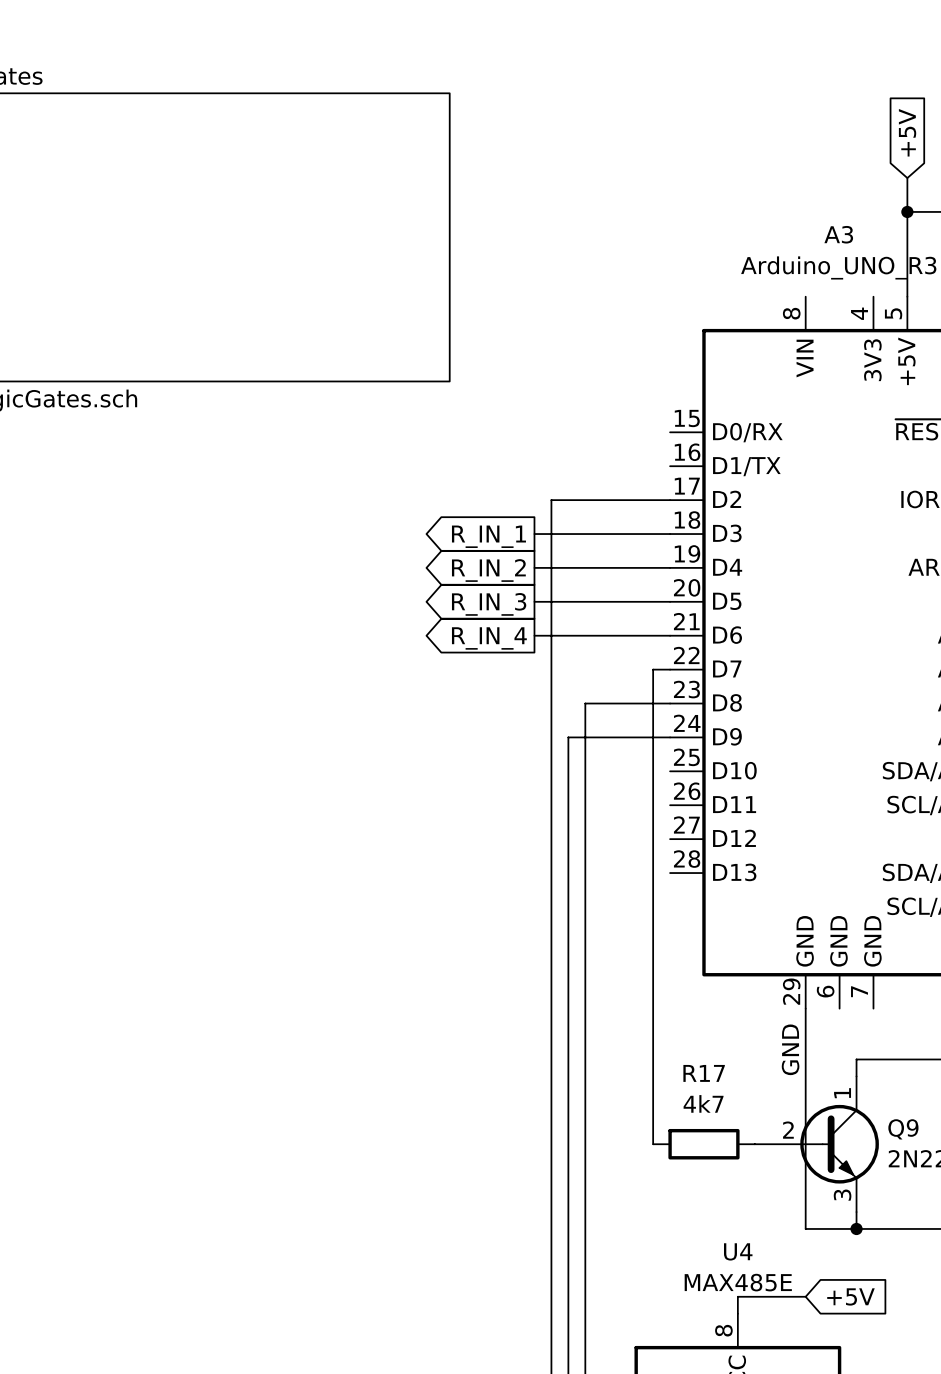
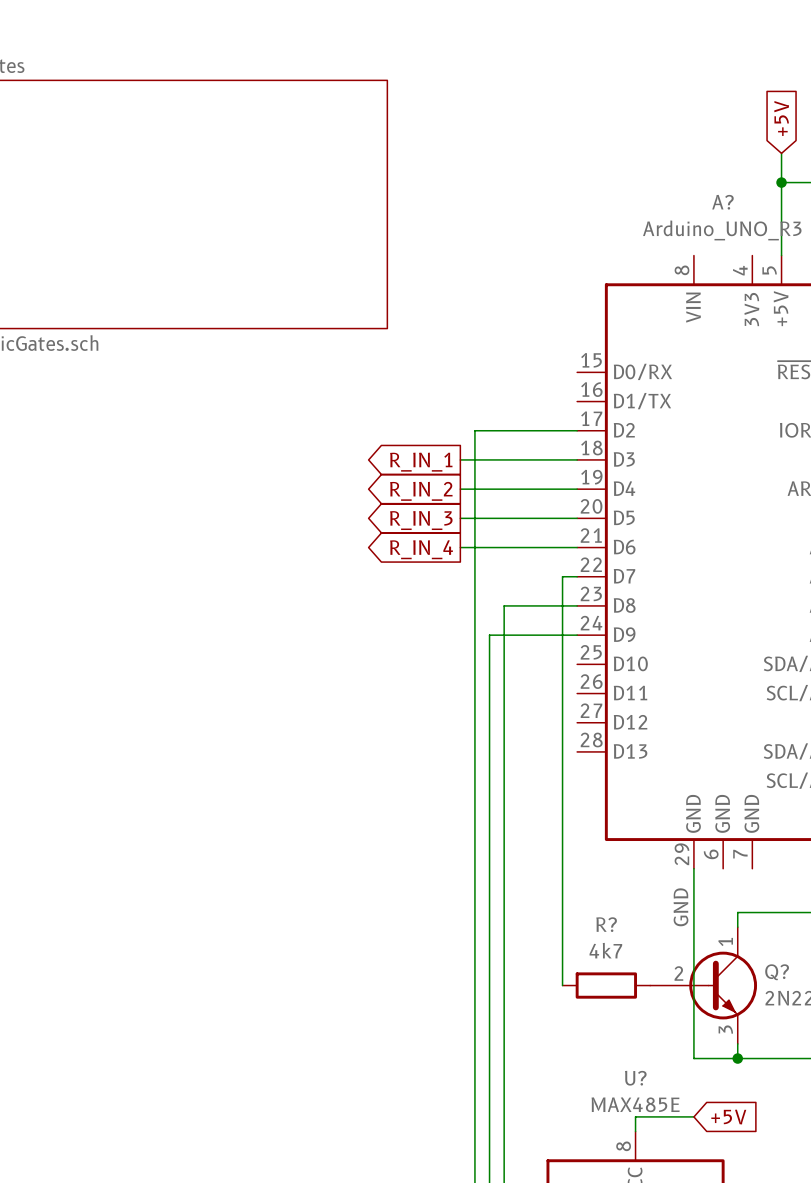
A3 name: A3 (838, 234) -> A? (722, 202)
R17 name: R17 (704, 1073) -> R? (606, 924)
Q9 name: Q9 (903, 1129) -> Q? (777, 972)
U4 name: U4 (738, 1251) -> U? (635, 1078)

